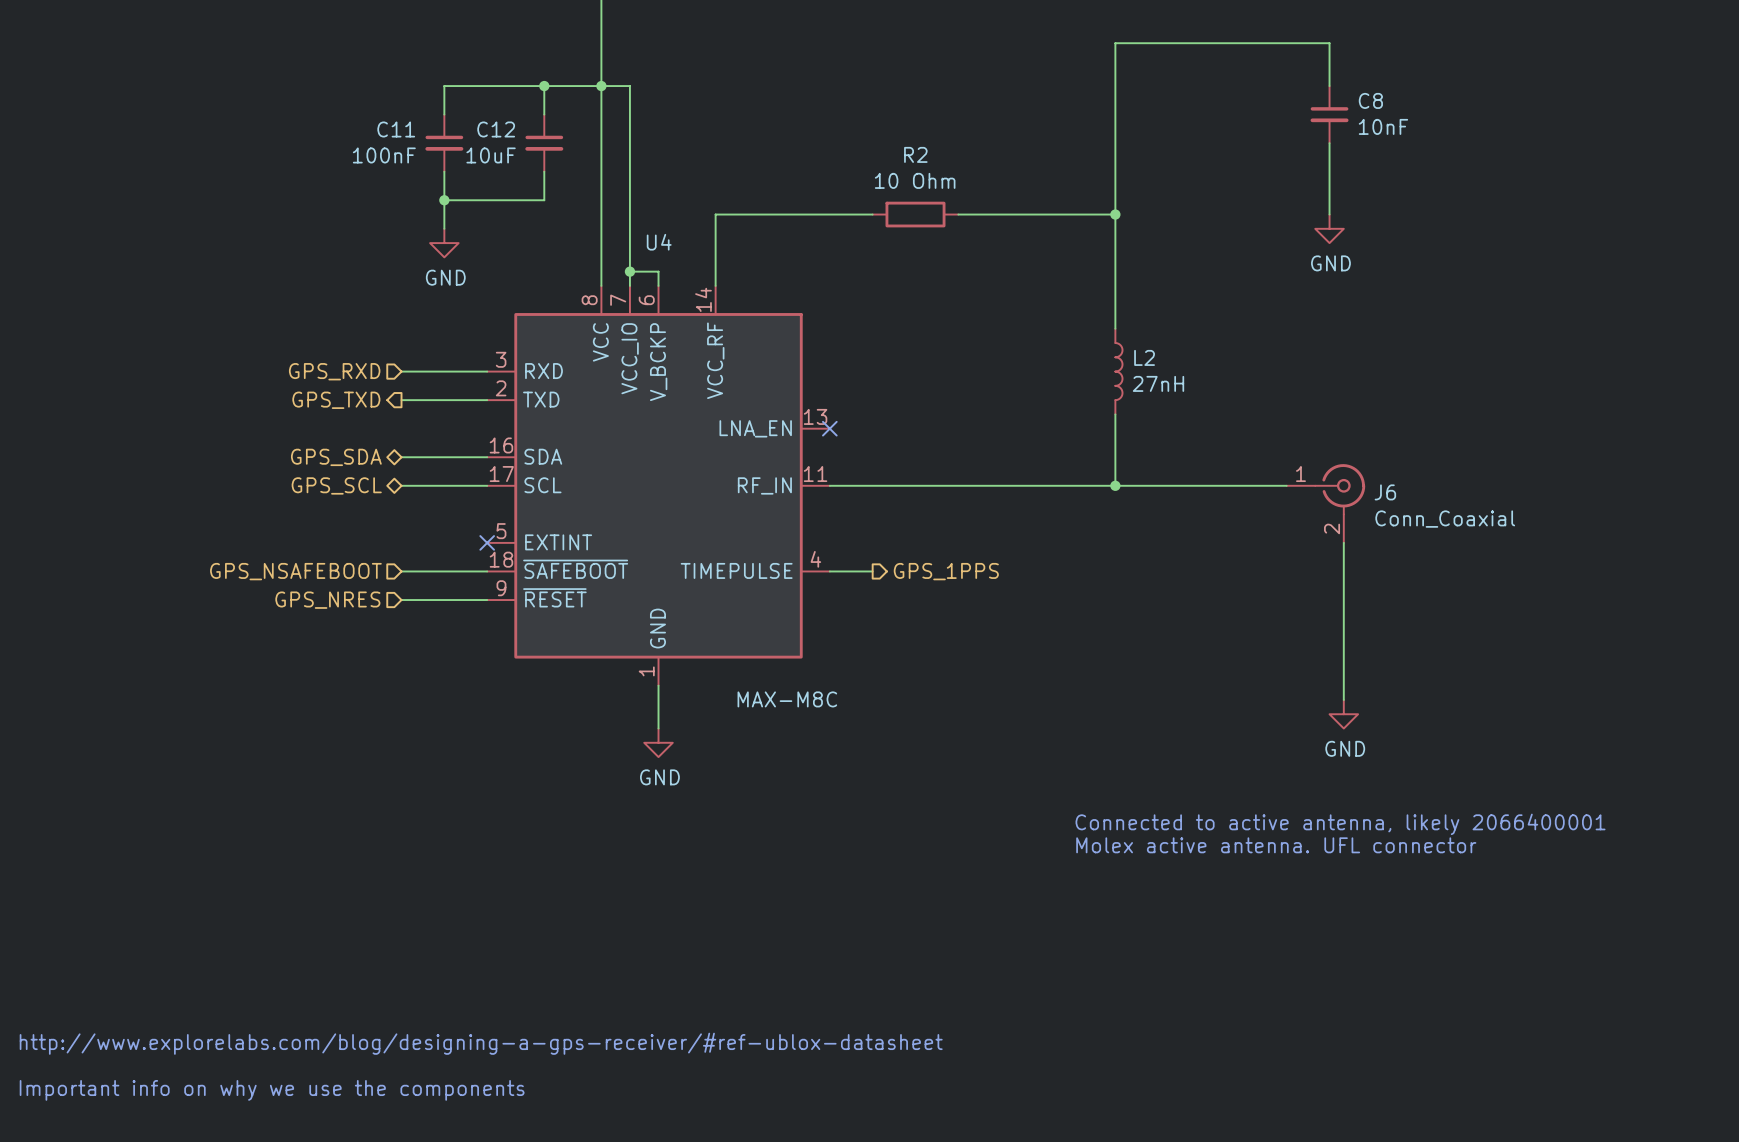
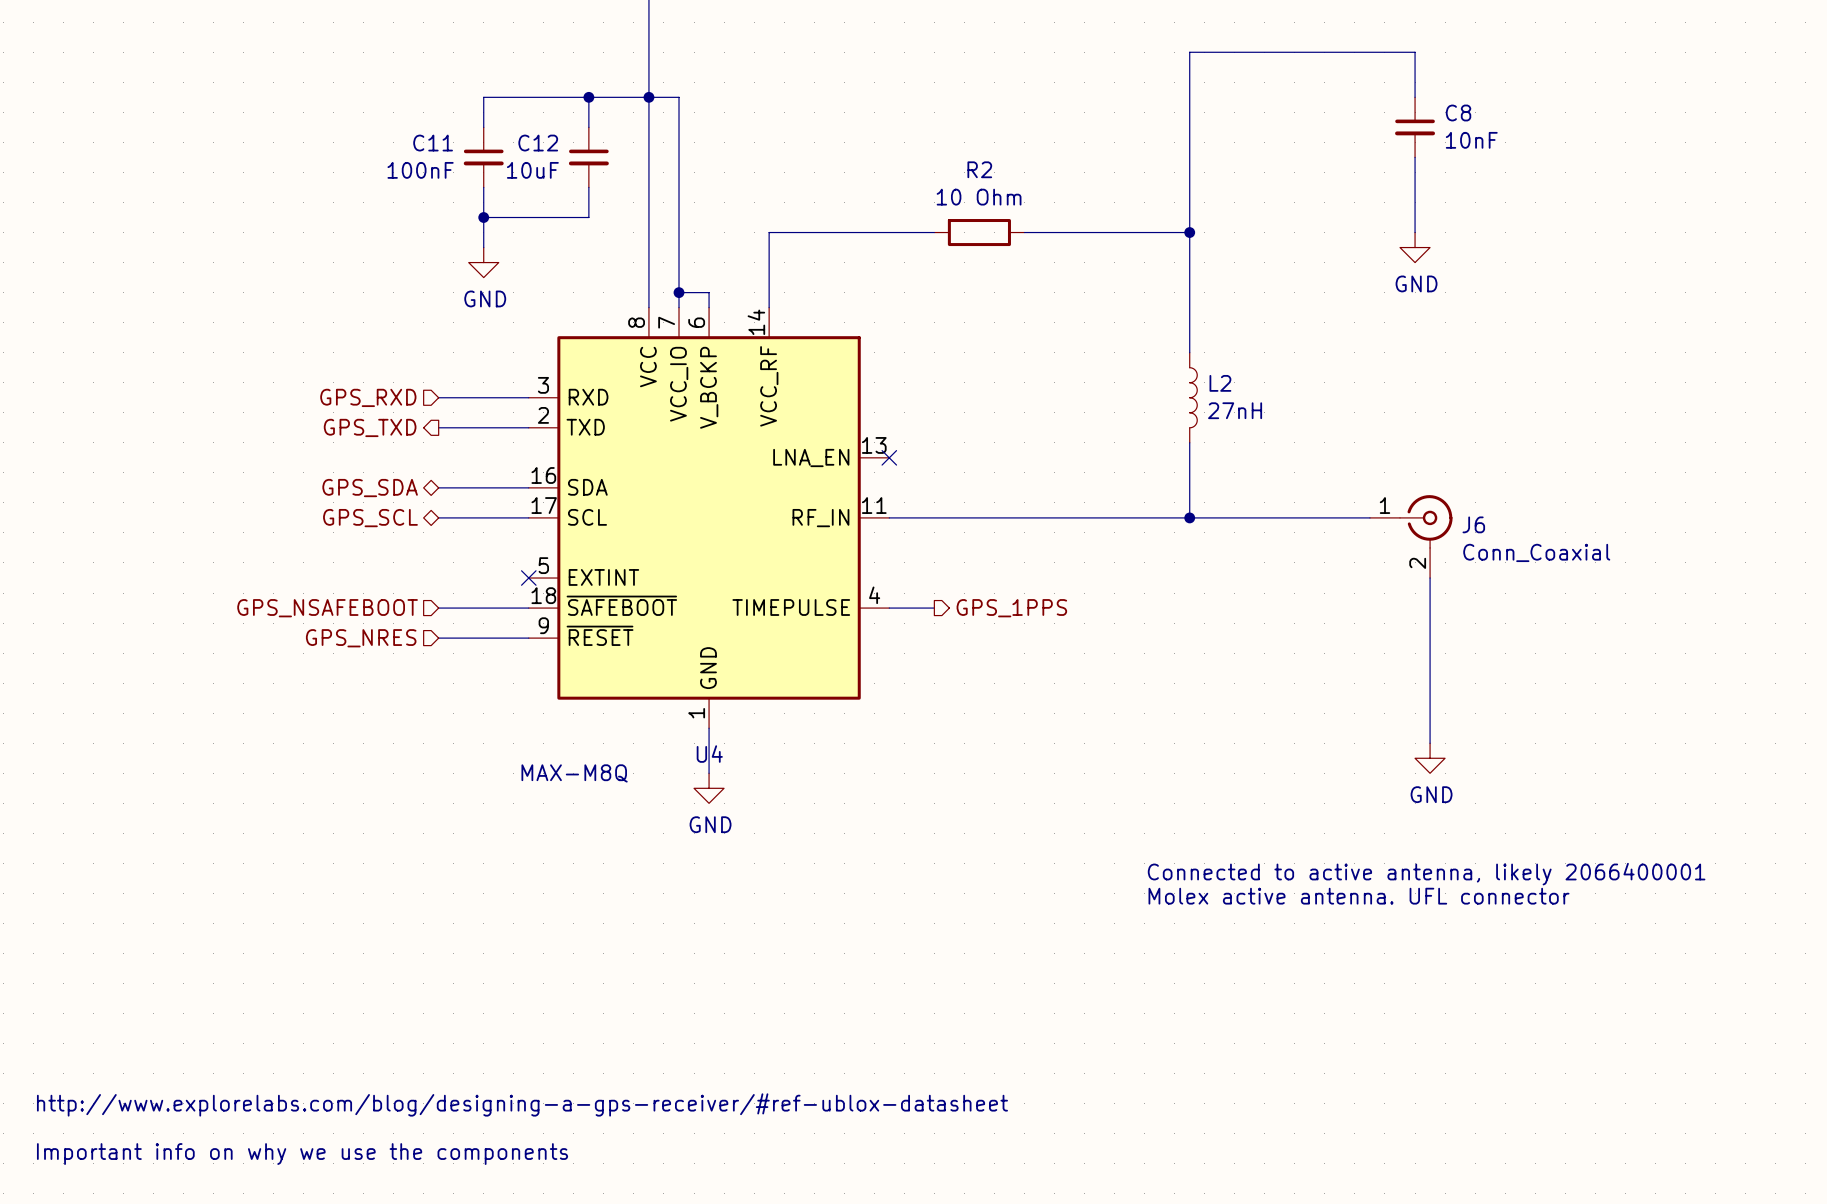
U4 name position: U4 (659, 242) -> U4 (709, 754)
U4 value: MAX-M8C (787, 699) -> MAX-M8Q (574, 773)

